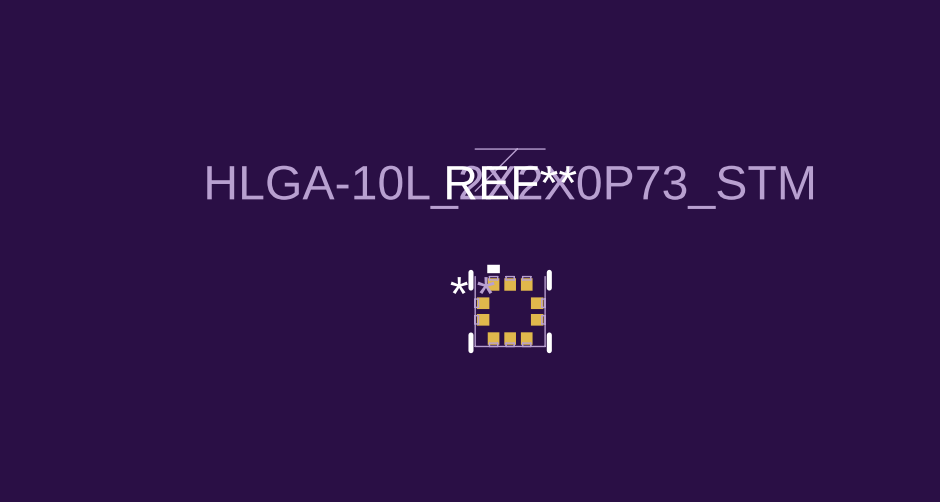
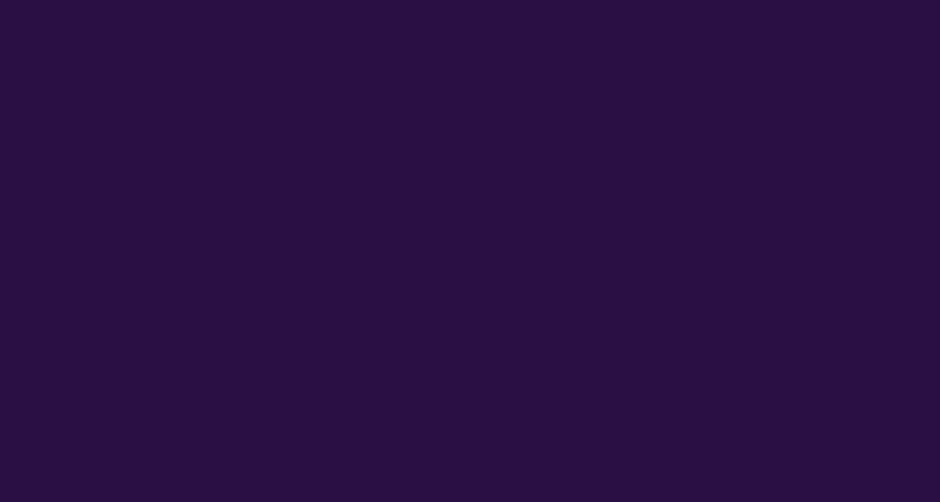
REF**: HLGA-10L_2X2X0P73_STM (510, 250) -> none

